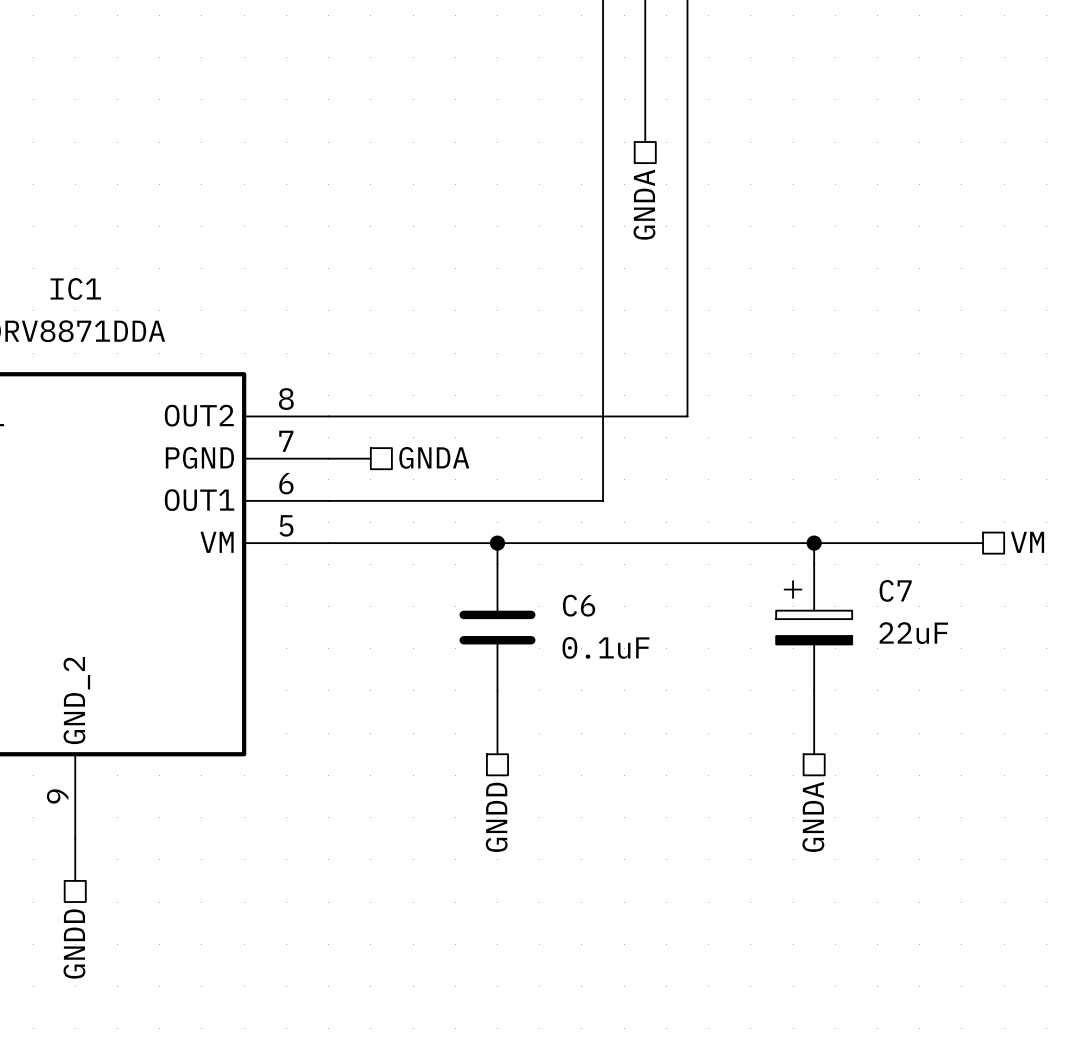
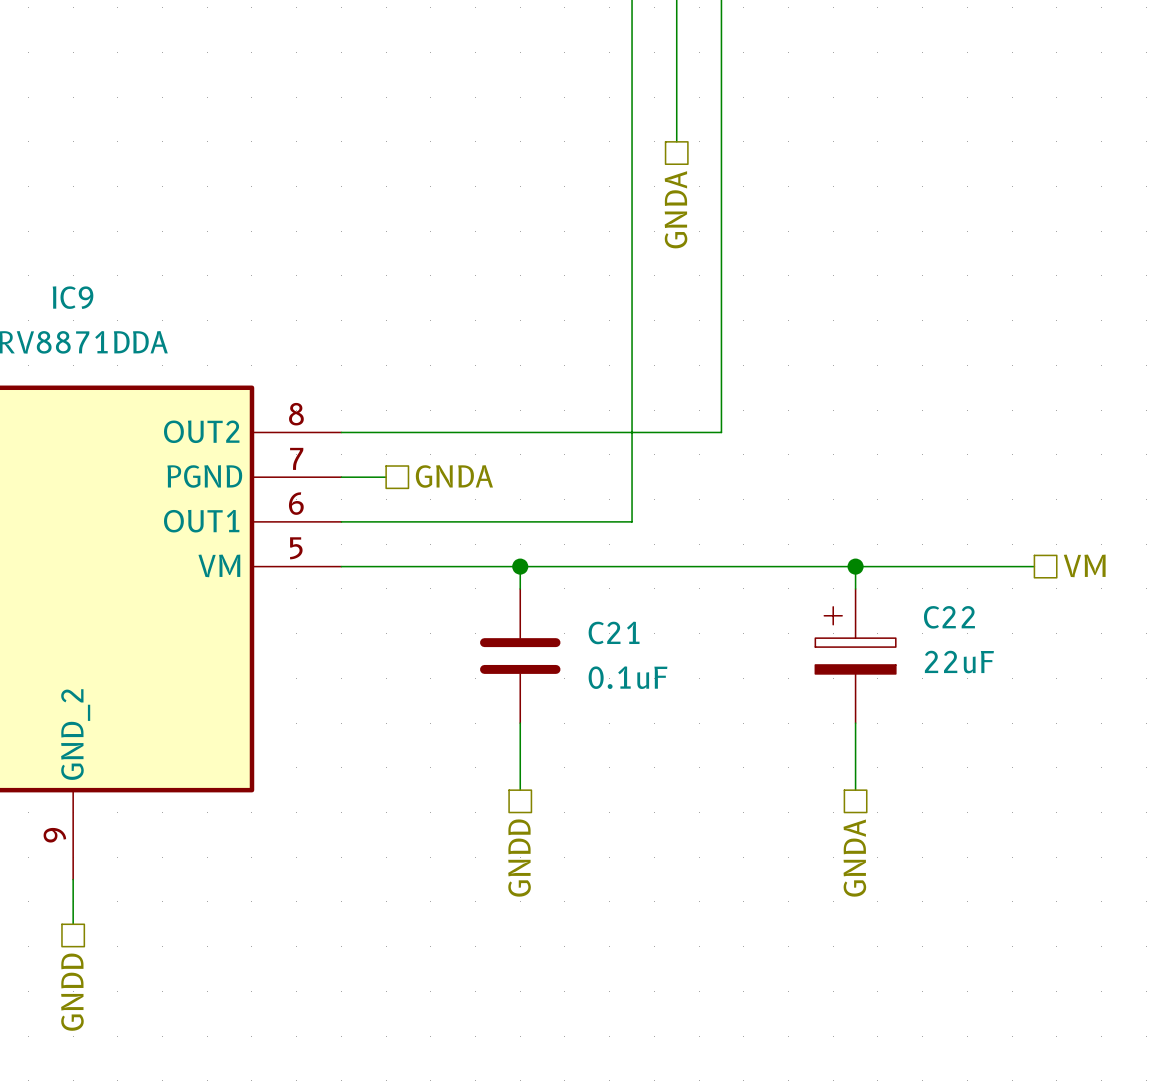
IC1 name: IC1 (75, 288) -> IC9 (73, 297)
C7 name: C7 (895, 590) -> C22 (949, 617)
C6 name: C6 (579, 605) -> C21 (614, 632)

